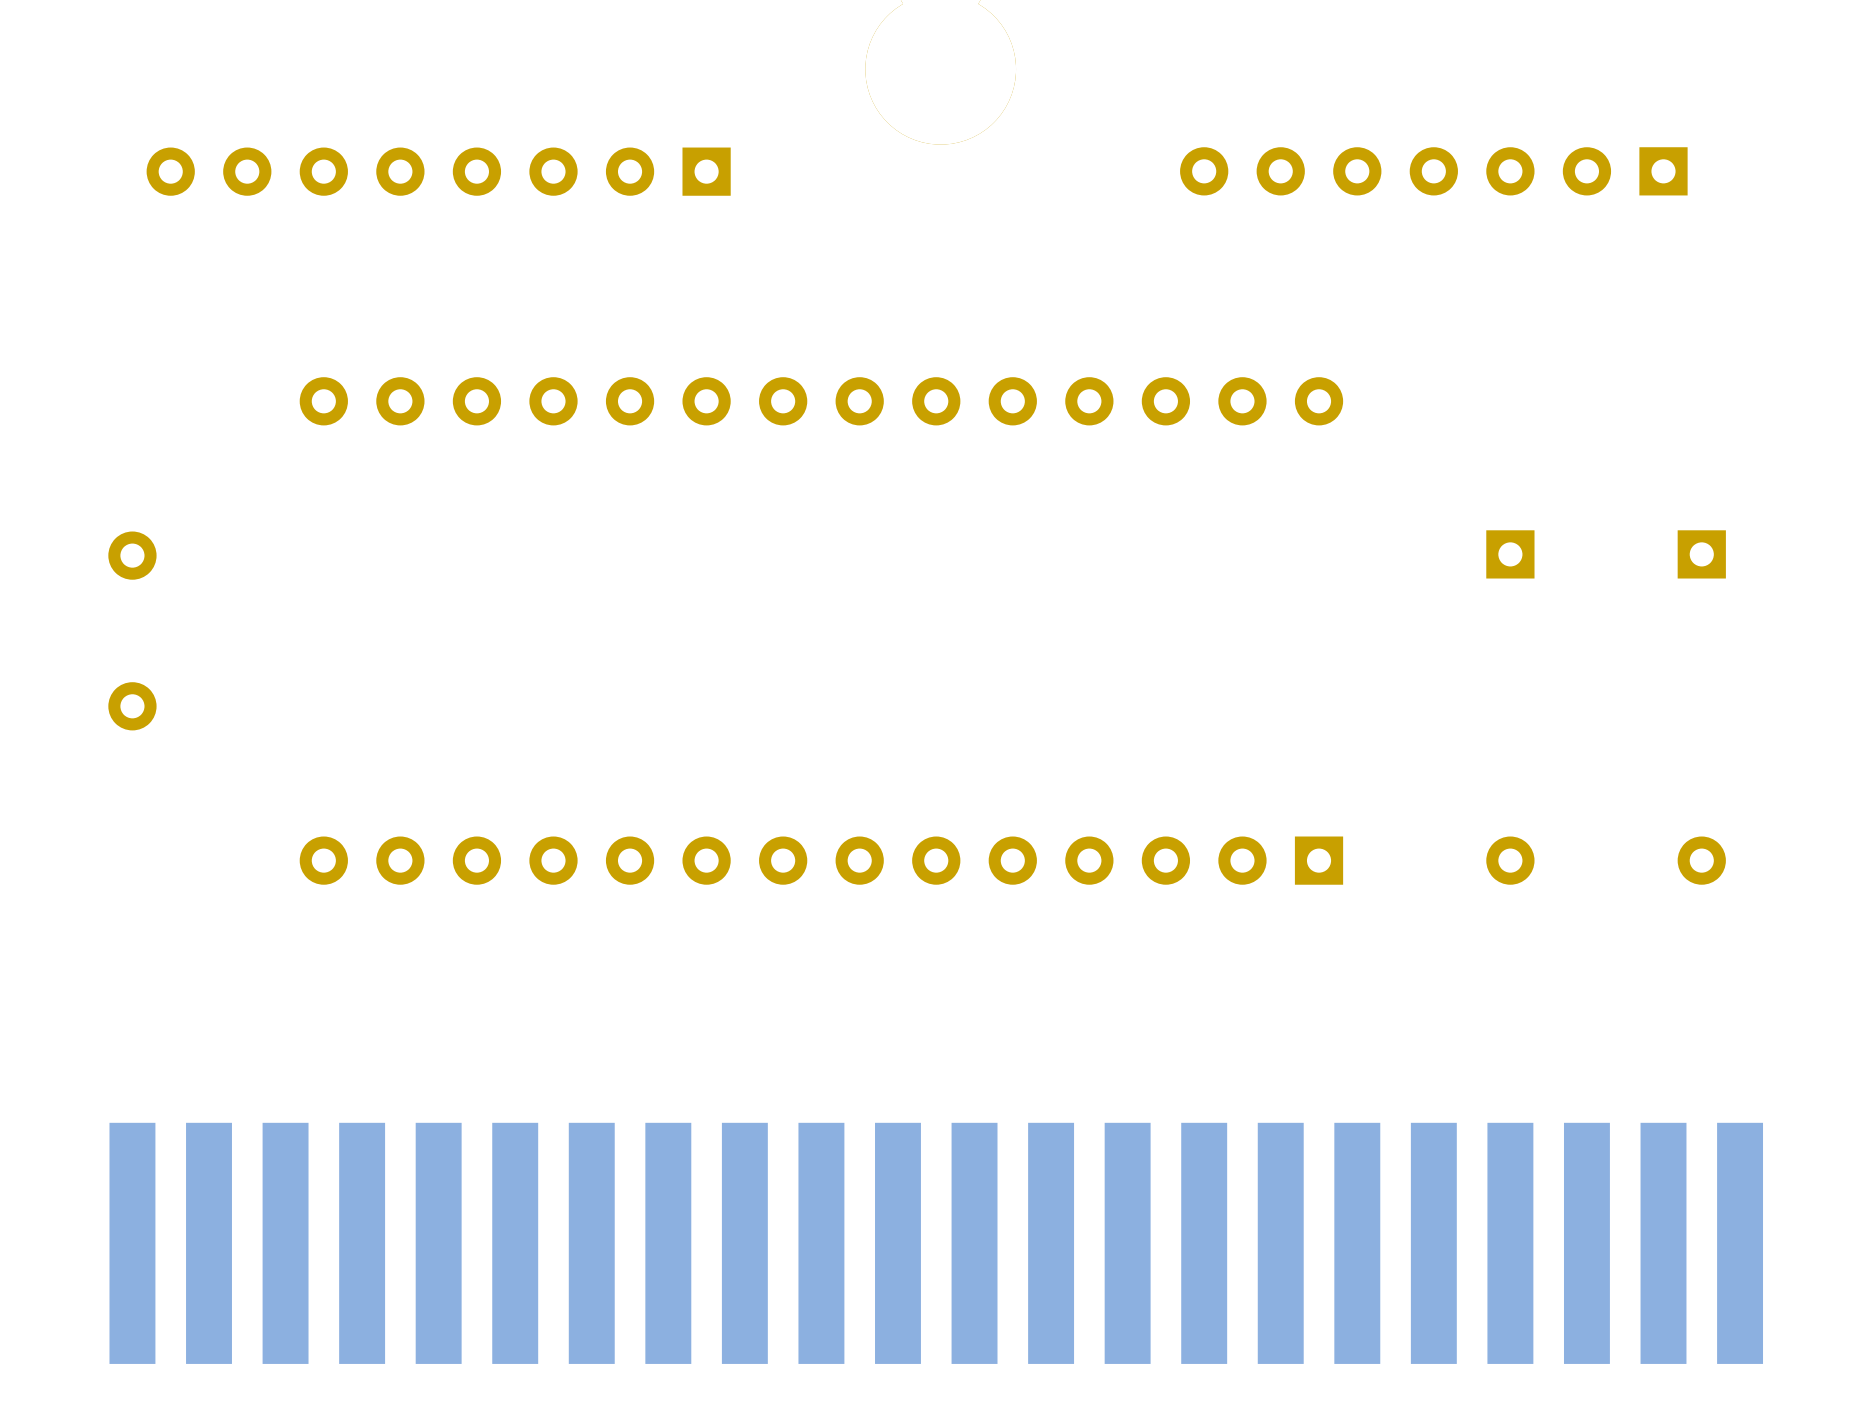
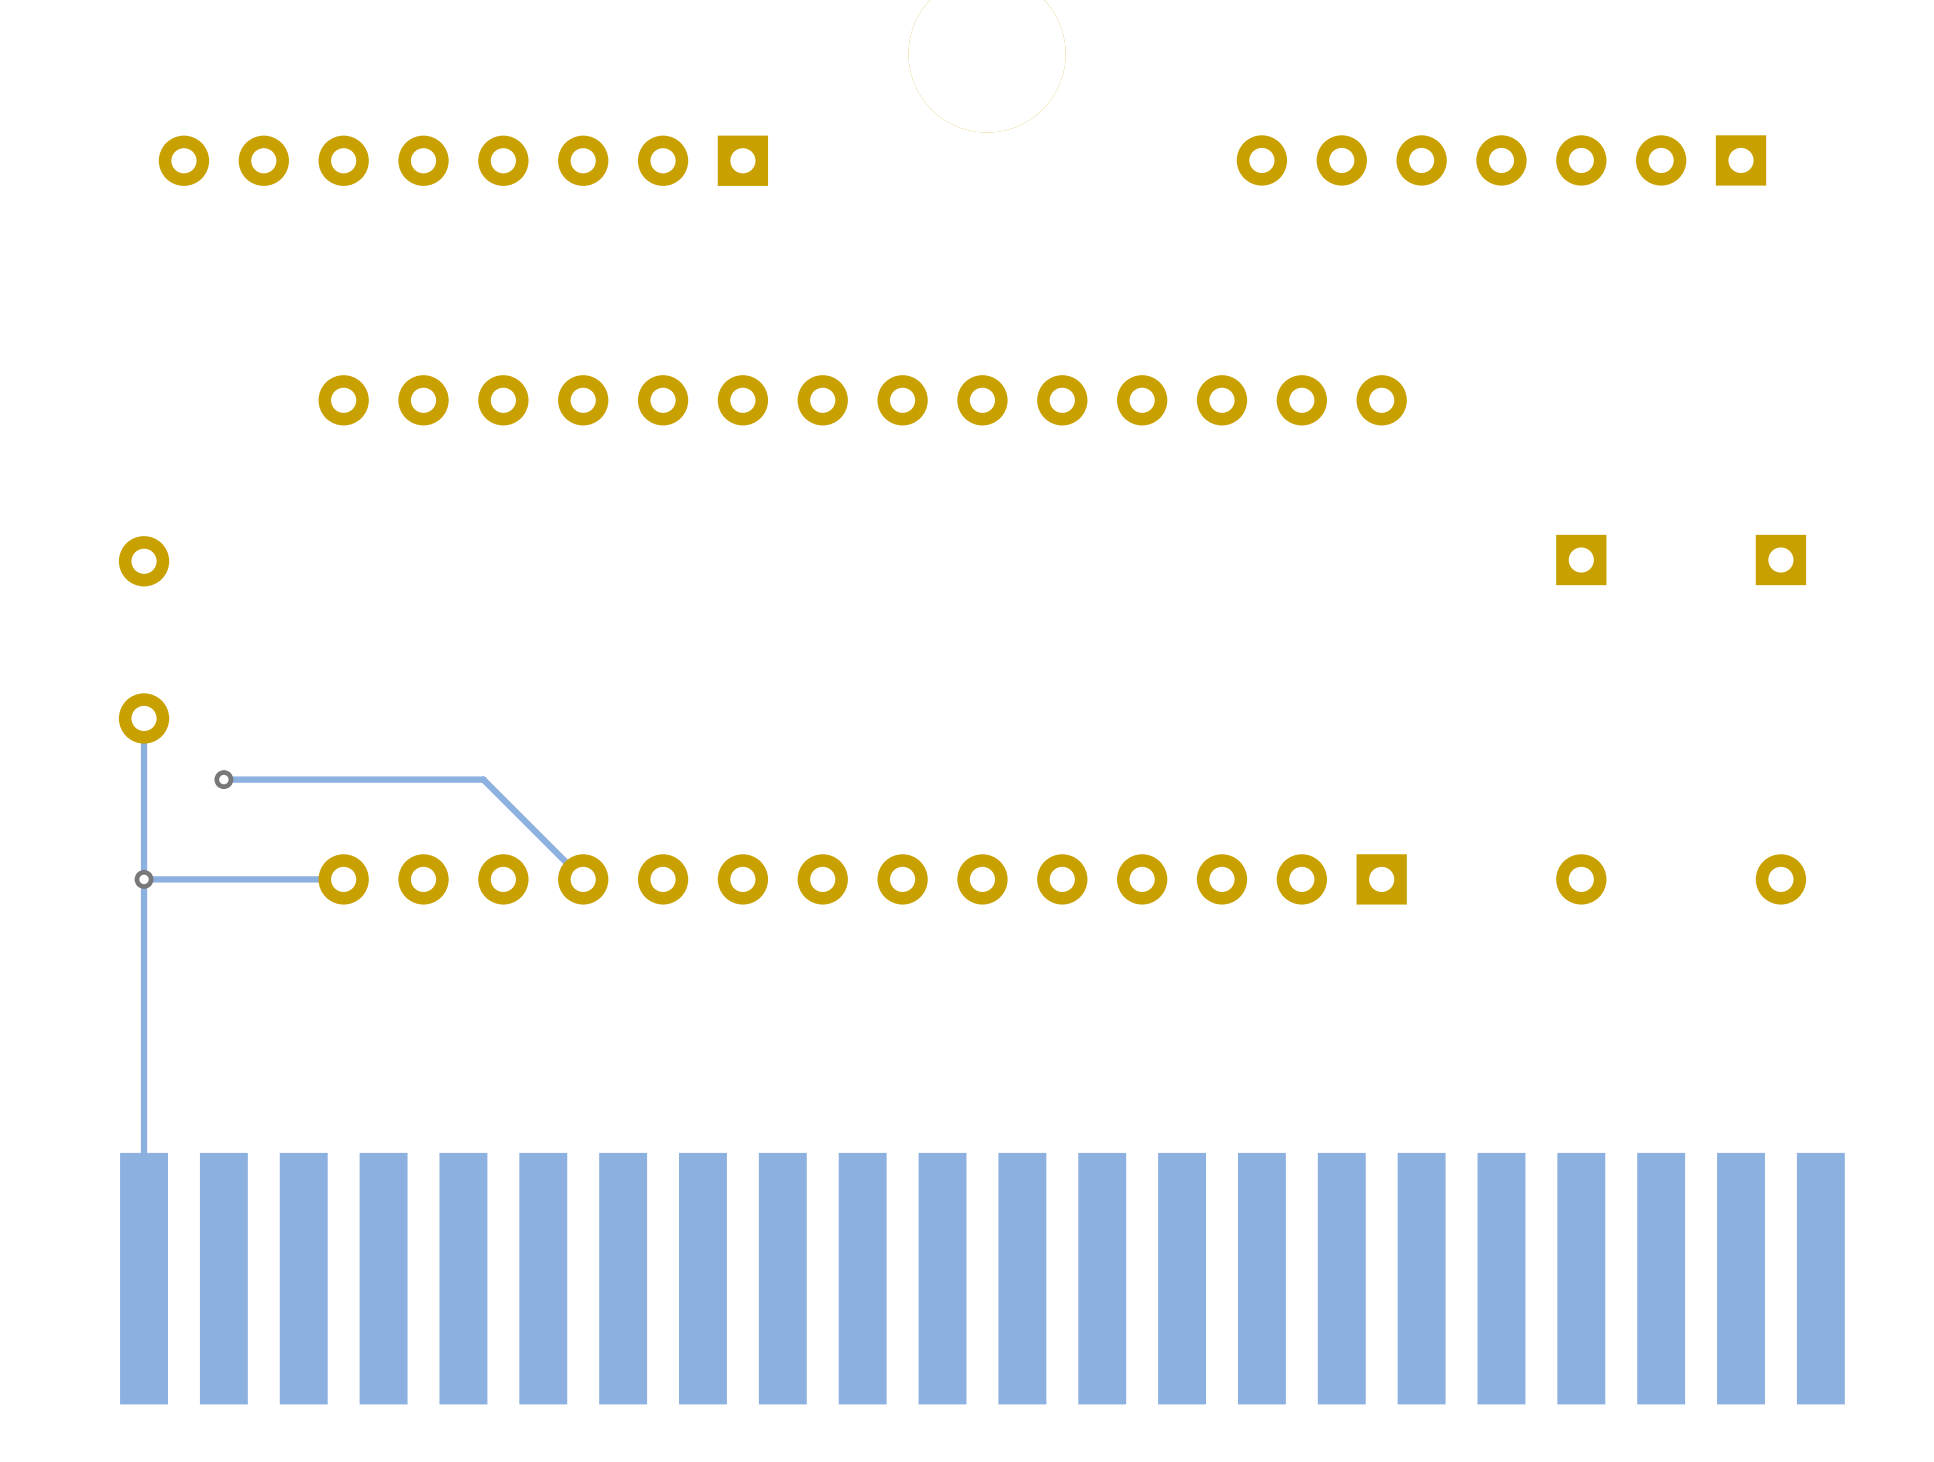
track: none -> (144, 718) (144, 1278)
track: none -> (223, 779) (483, 779) (583, 879)
via: none -> (223, 779)
via: none -> (144, 879)
track: none -> (343, 879) (144, 879)

